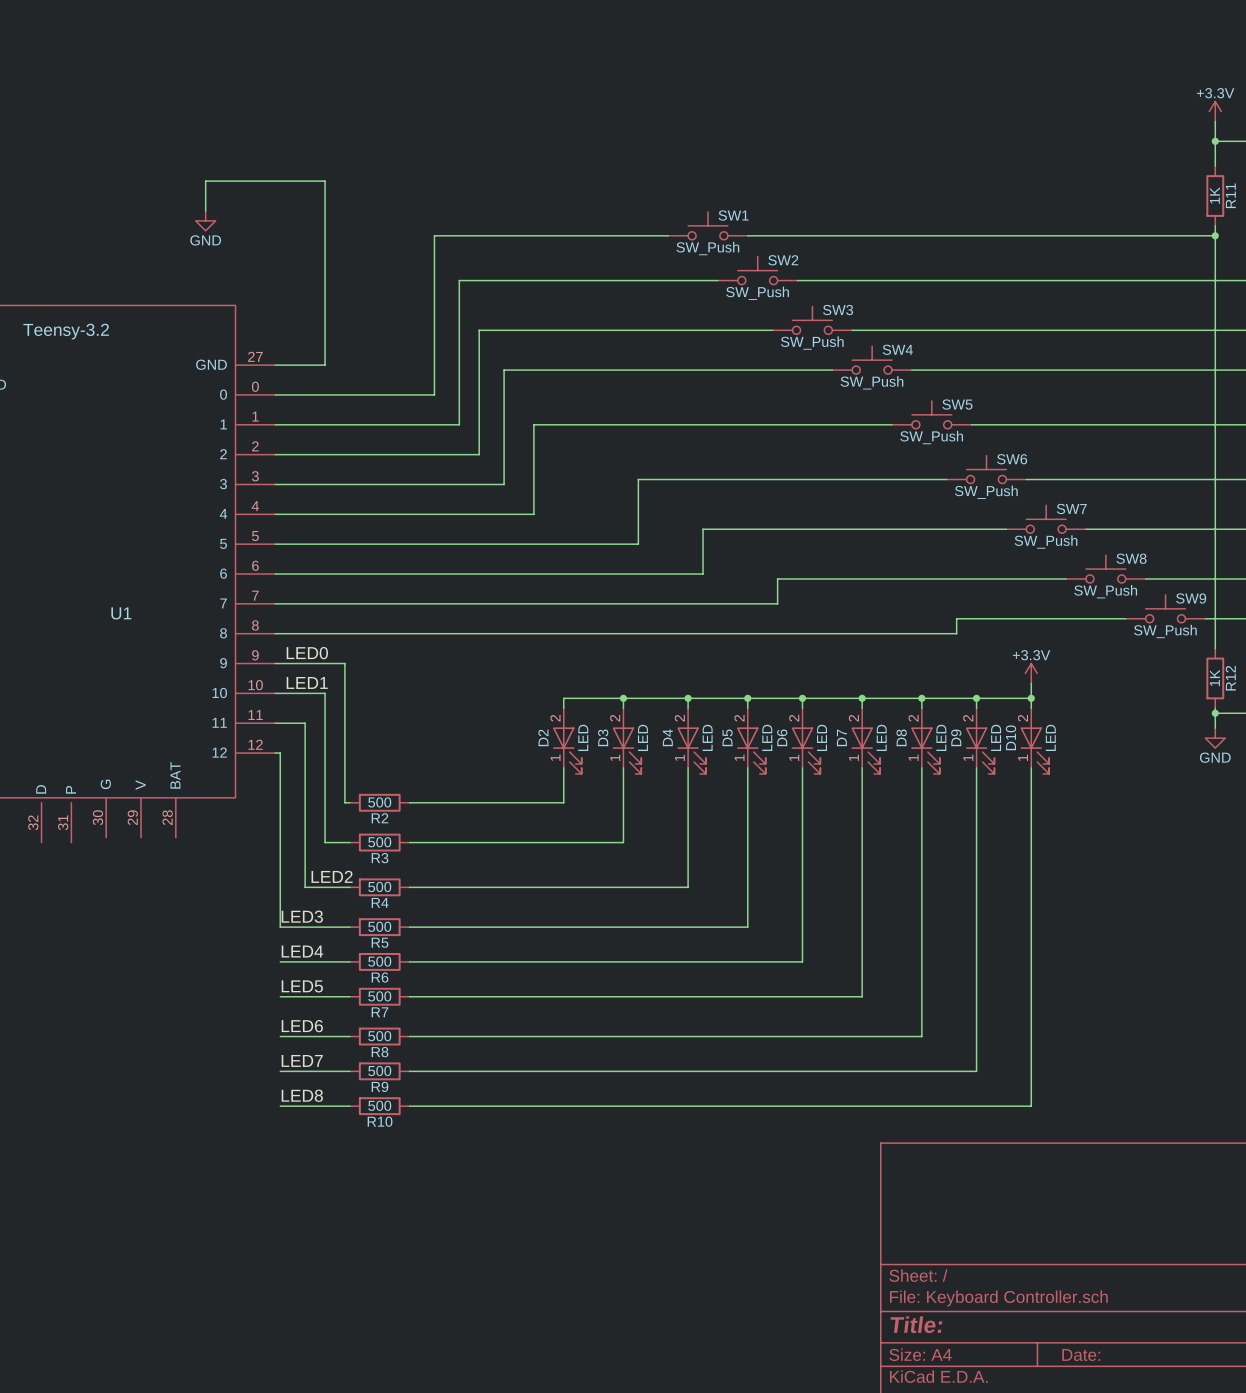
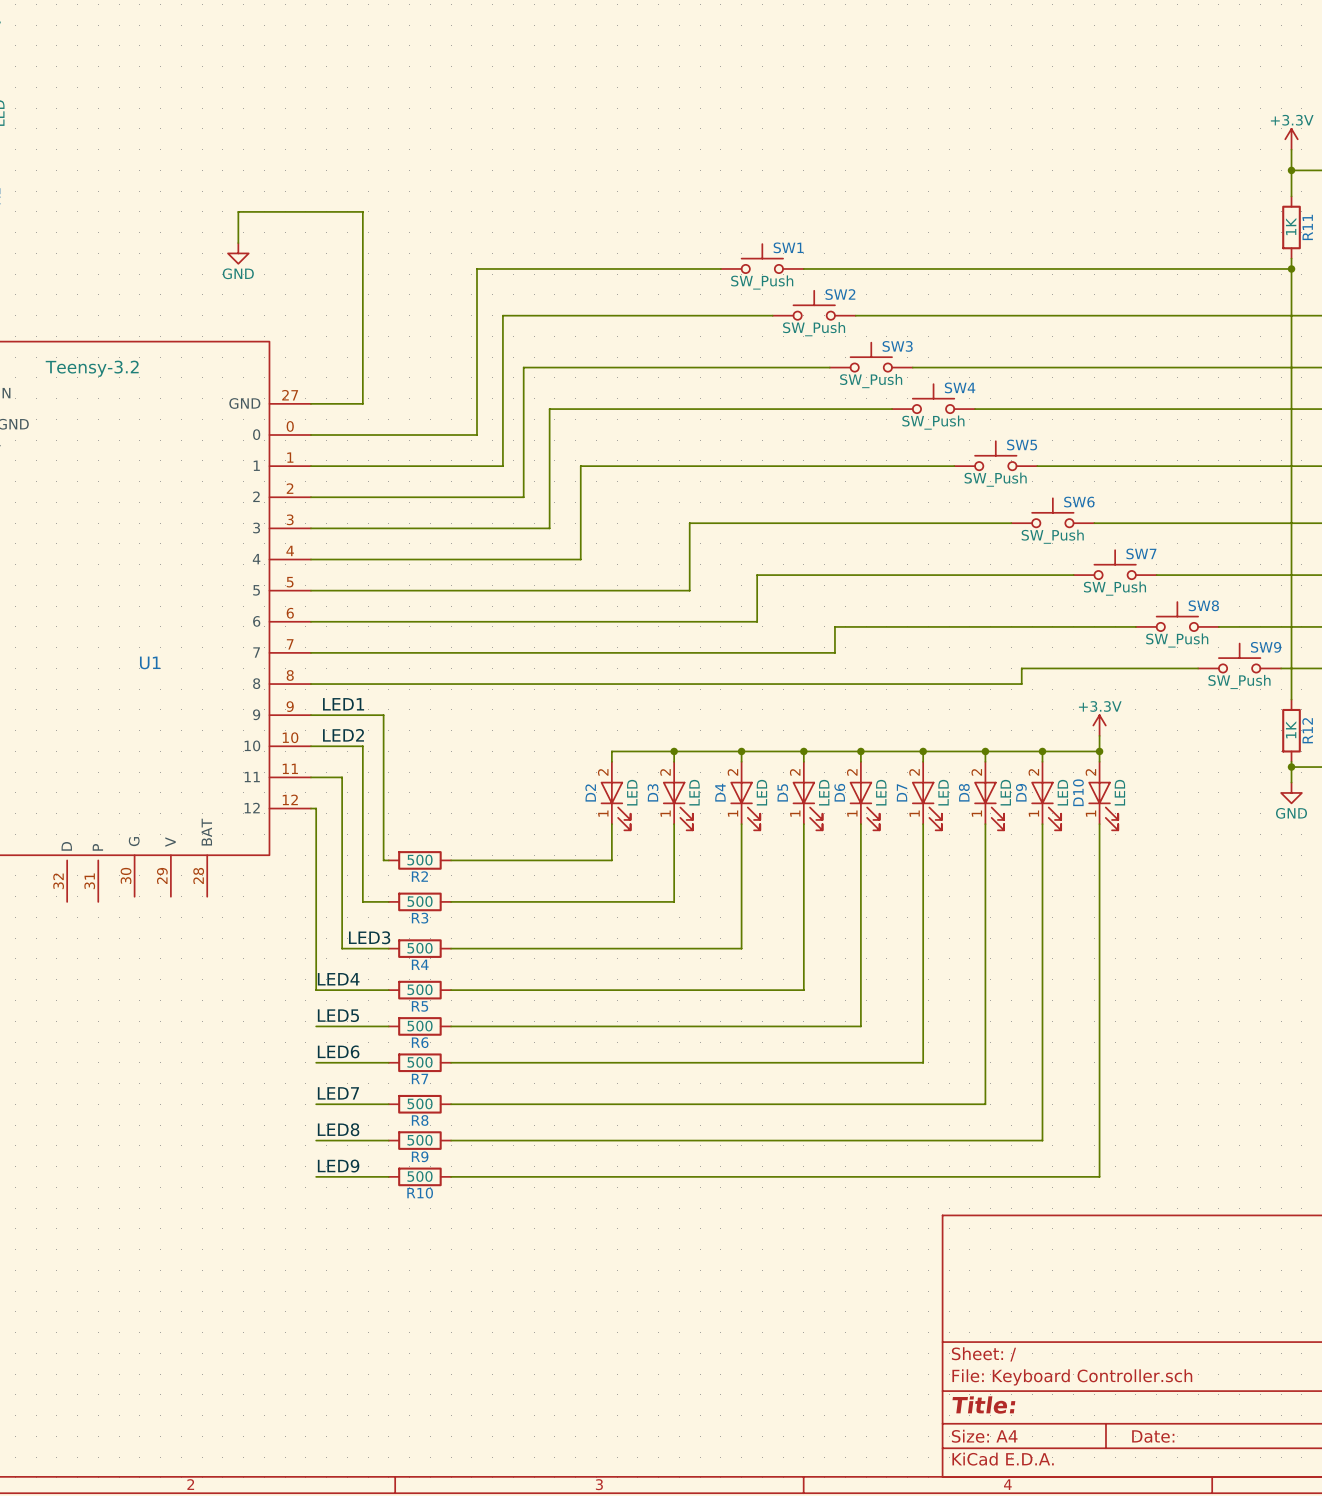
label: LED0 (307, 653) -> LED1 (343, 704)
label: LED1 (307, 682) -> LED2 (343, 735)
label: LED2 (332, 876) -> LED3 (369, 937)
label: LED3 (302, 916) -> LED4 (338, 979)
label: LED4 (302, 951) -> LED5 (338, 1015)
label: LED5 (302, 986) -> LED6 (338, 1051)
label: LED6 (302, 1026) -> LED7 (338, 1093)
label: LED7 (302, 1060) -> LED8 (338, 1129)
label: LED8 (302, 1095) -> LED9 (338, 1166)

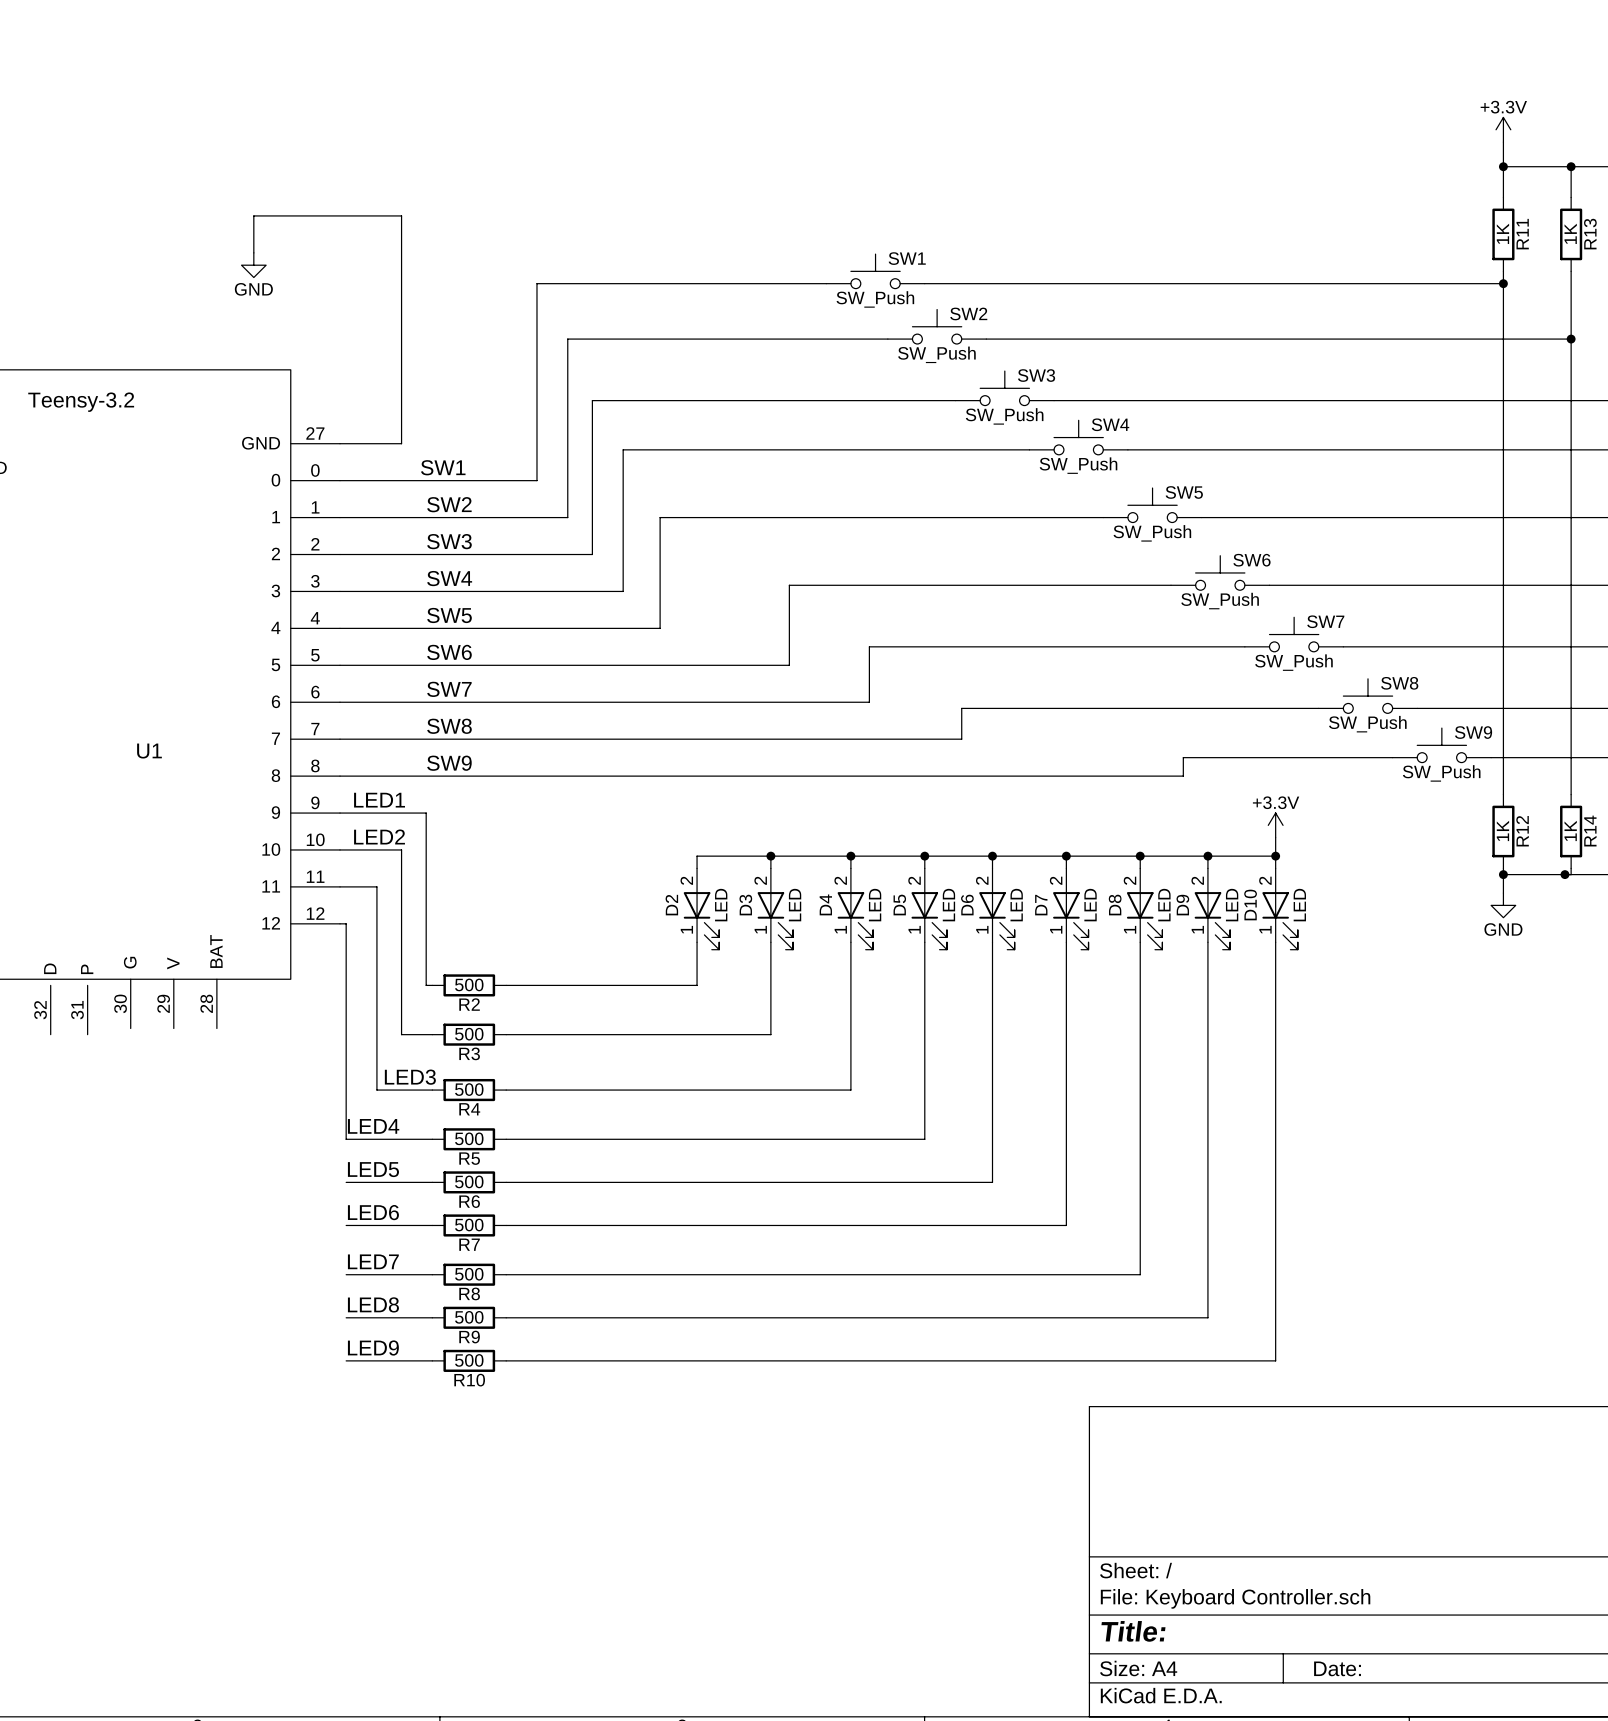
label: none -> SW1 (443, 467)
label: none -> SW2 (449, 504)
label: none -> SW3 (449, 541)
label: none -> SW4 (449, 578)
label: none -> SW5 (449, 615)
label: none -> SW6 (449, 652)
label: none -> SW7 (449, 689)
label: none -> SW8 (449, 726)
label: none -> SW9 (449, 763)

